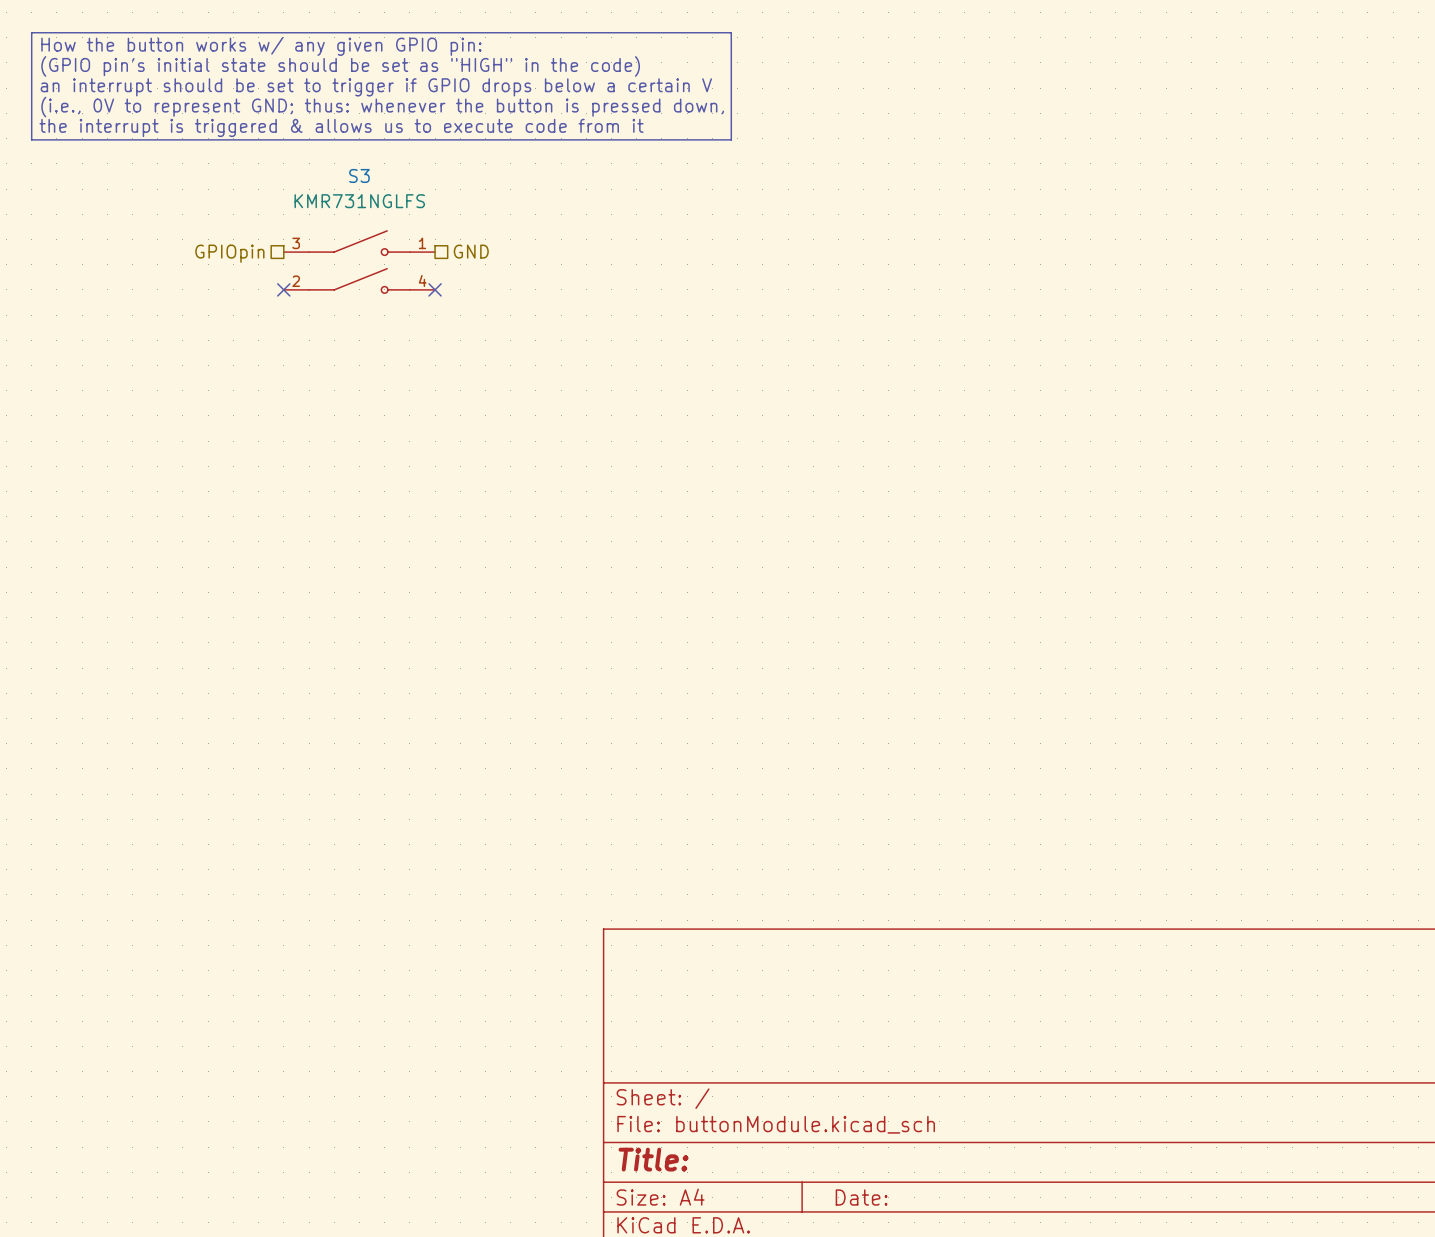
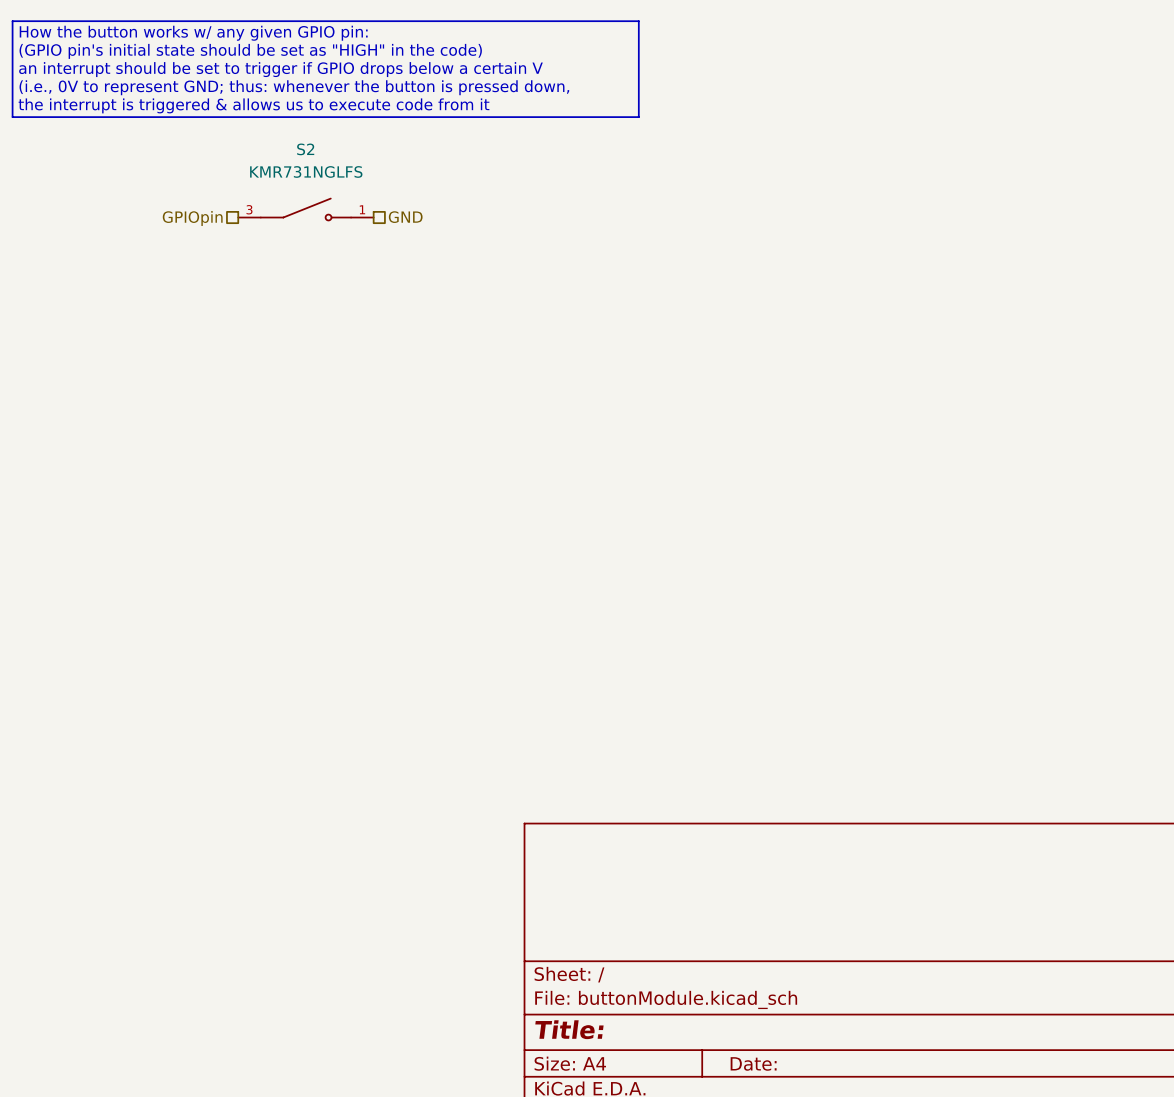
S2: none -> KMR731NGLFS (305, 209)
S3: KMR731NGLFS (359, 262) -> none
no-connect mark: (283, 289) -> none
no-connect mark: (435, 289) -> none

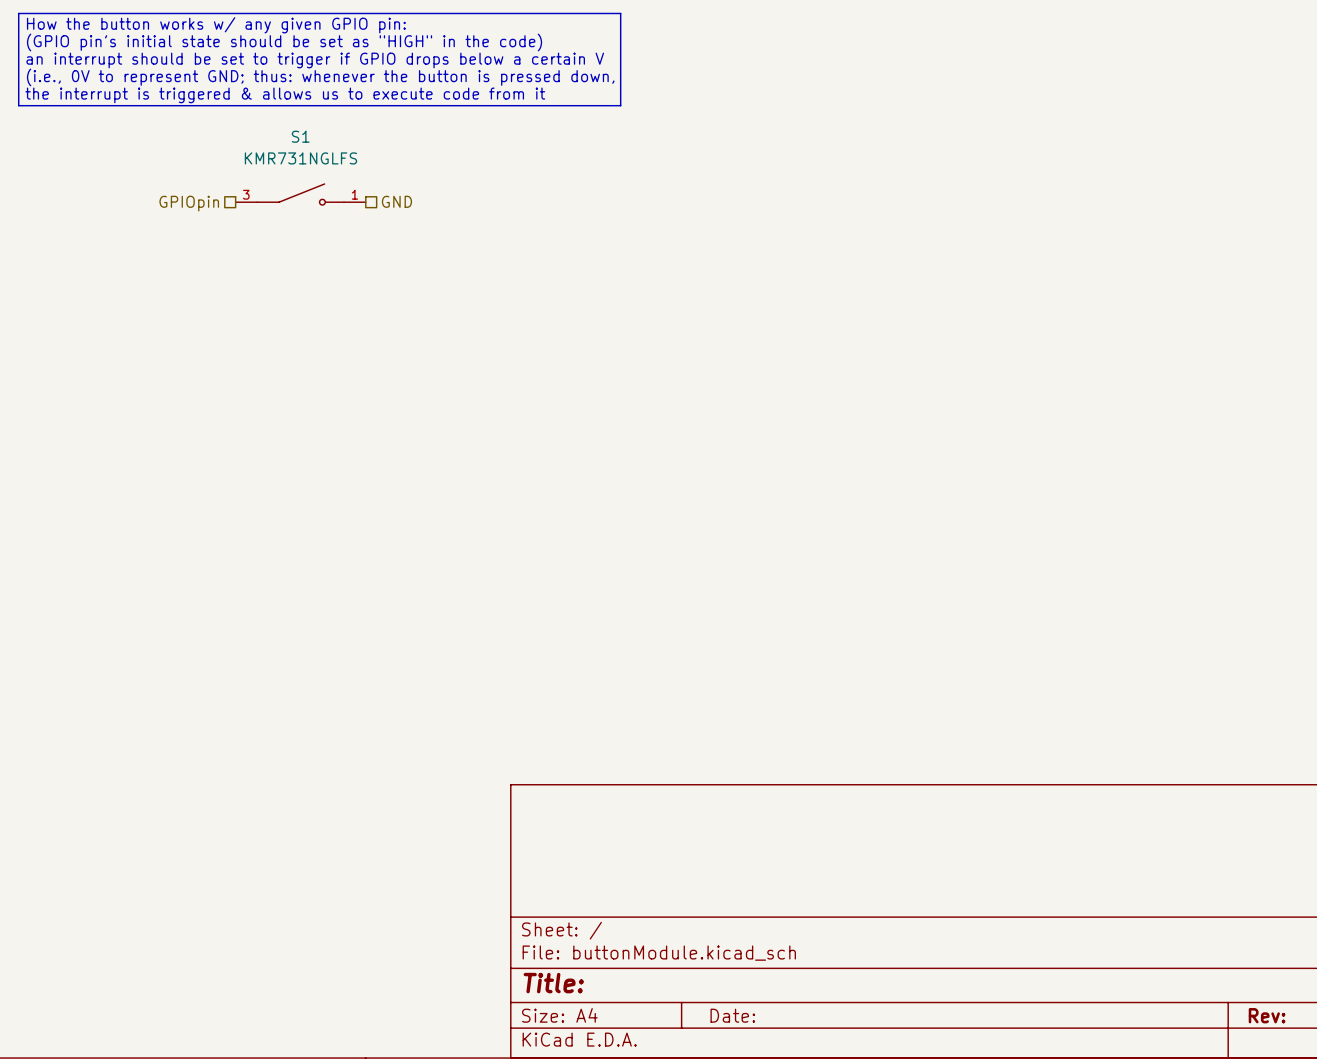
S2 name: S2 (305, 149) -> S1 (300, 136)

